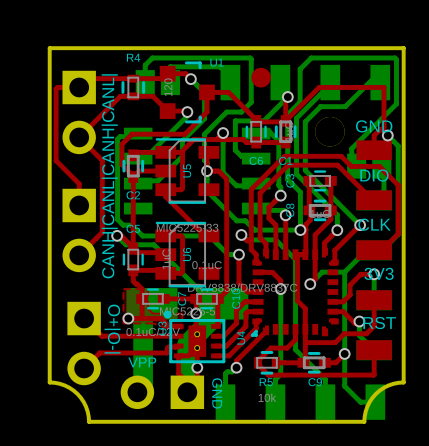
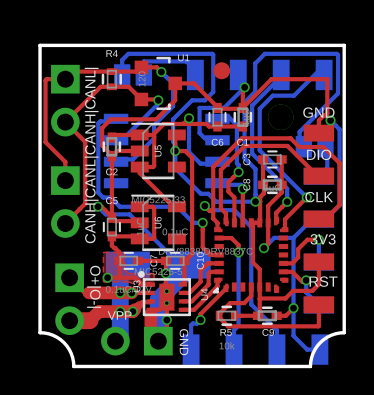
top track width: thin (106, 336) (156, 336) -> thick (89, 292) (131, 292)
via: none -> (120, 292)
via: none -> (131, 292)
top track: (167, 348) (167, 352) (99, 352) (84, 368) -> (141, 303) (132, 311) (99, 311) (89, 320) (69, 320)
via: none -> (120, 311)
via: none -> (132, 311)
top track width: thin (178, 360) (178, 373) -> thick (150, 314) (150, 325)

